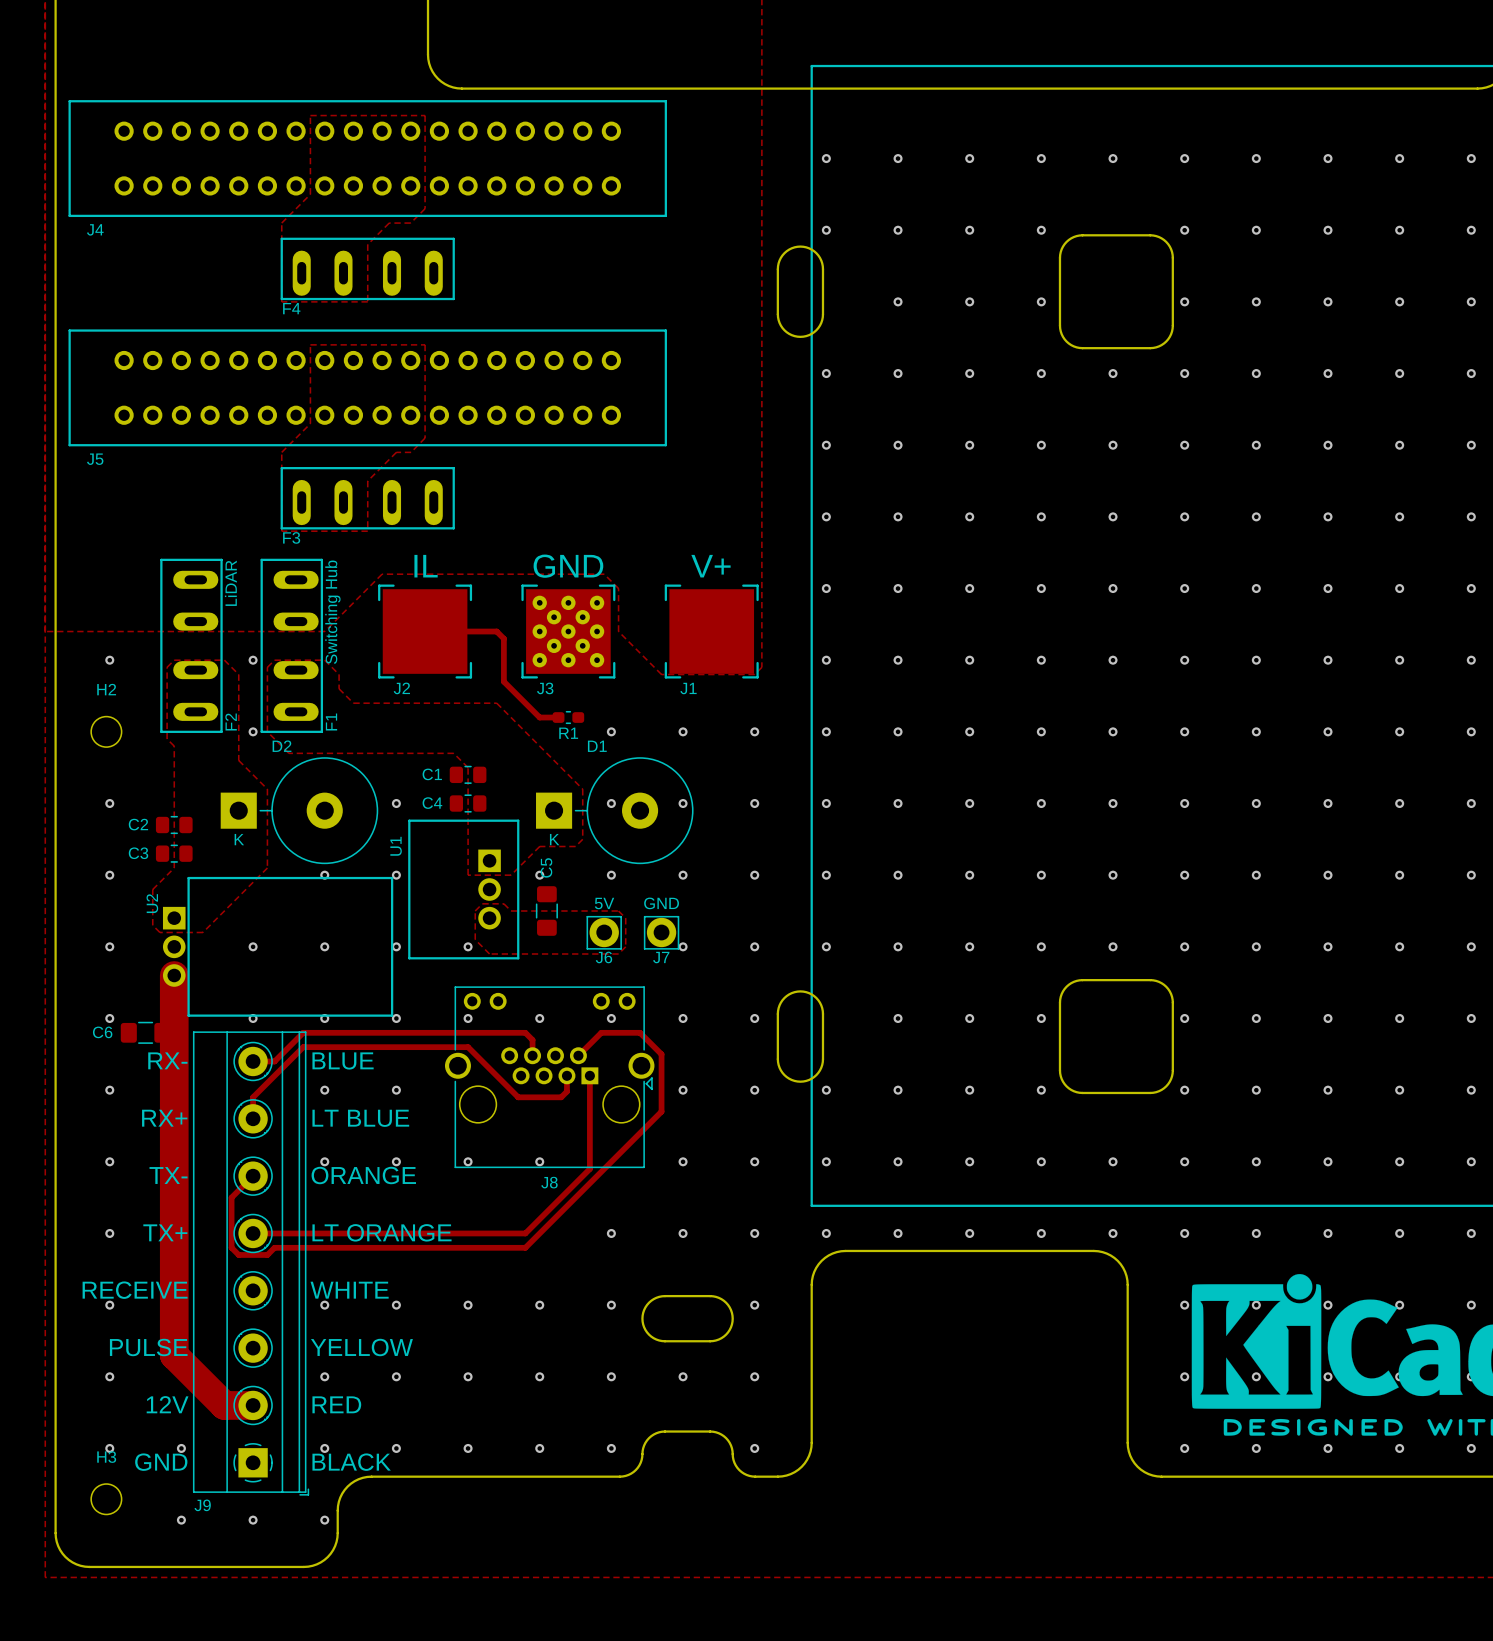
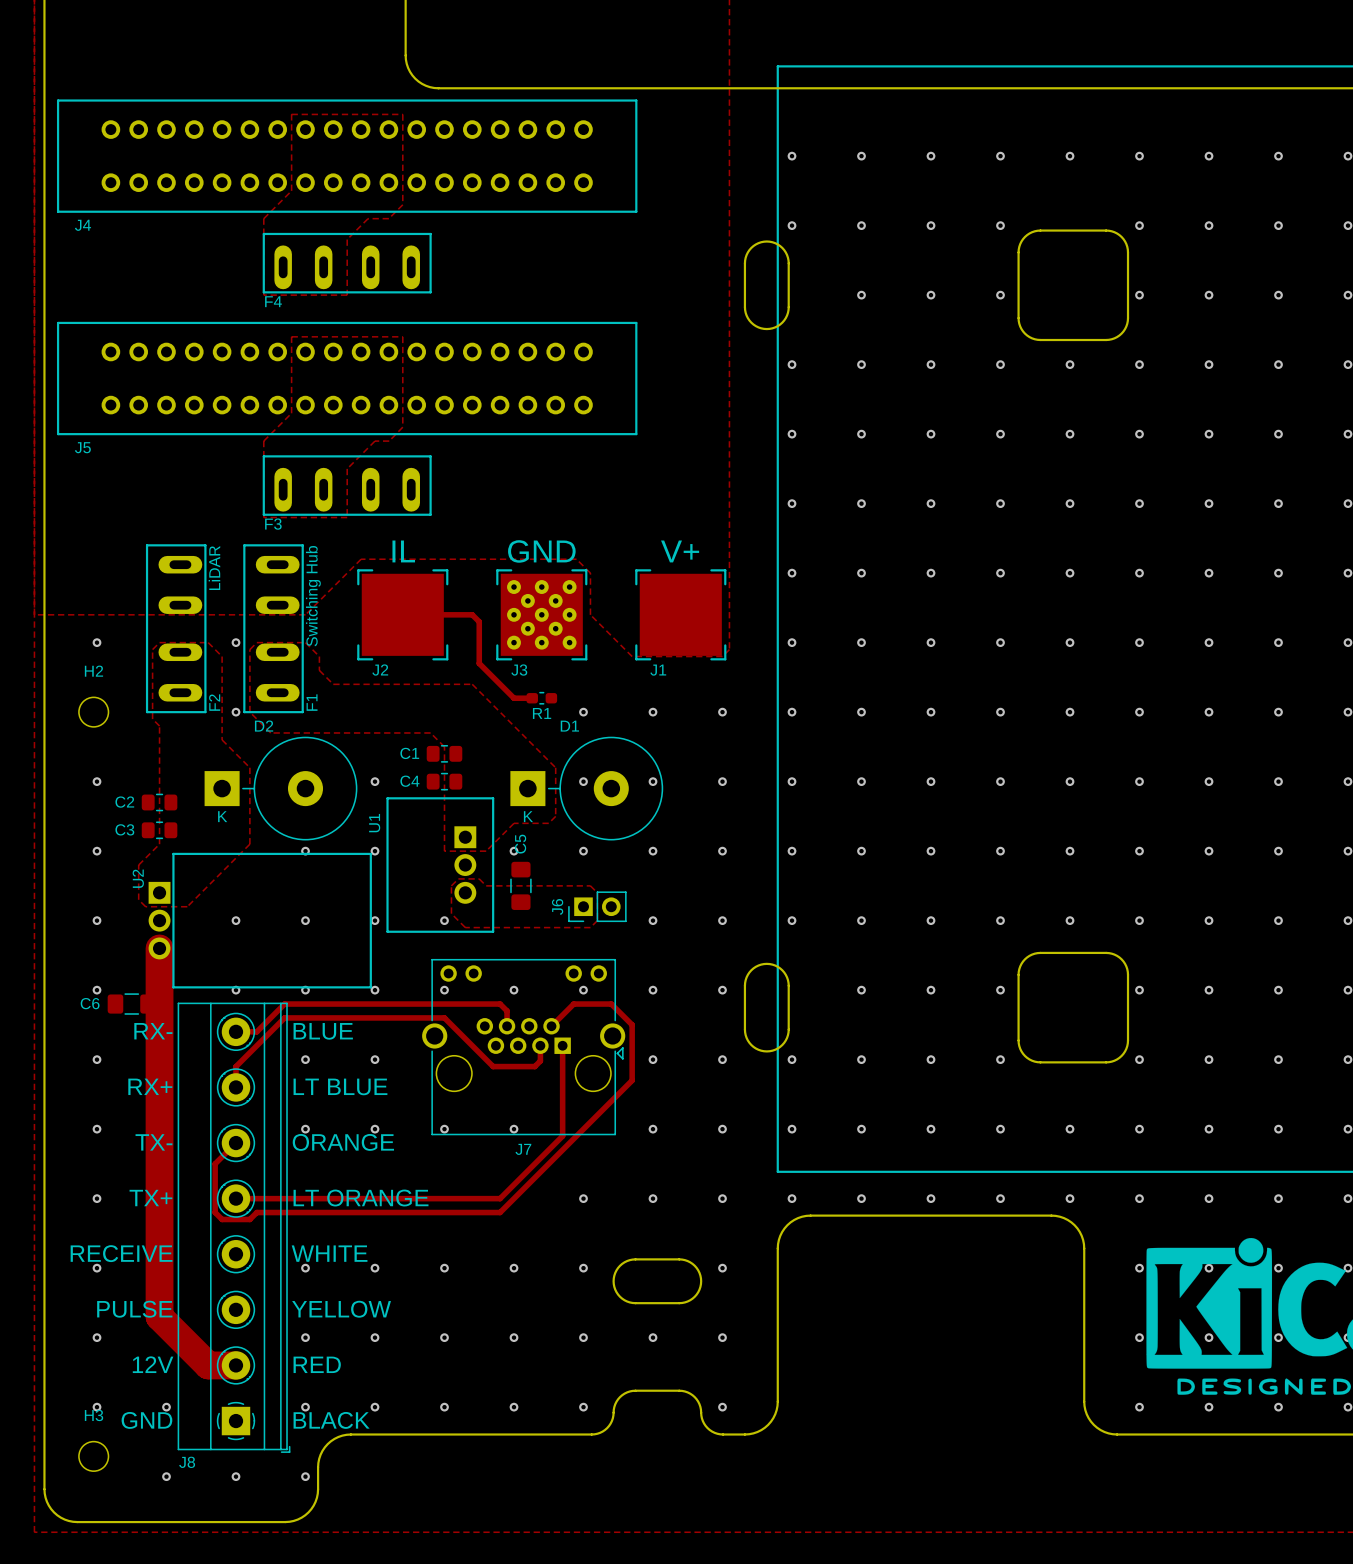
J6 footprint: [586, 916, 622, 950] -> [568, 891, 627, 922]
J7: (661, 932) -> none
J6 name position: J6 (603, 957) -> J6 (557, 906)
J8 name: J8 (549, 1182) -> J7 (523, 1149)
J9 name: J9 (202, 1505) -> J8 (187, 1462)

